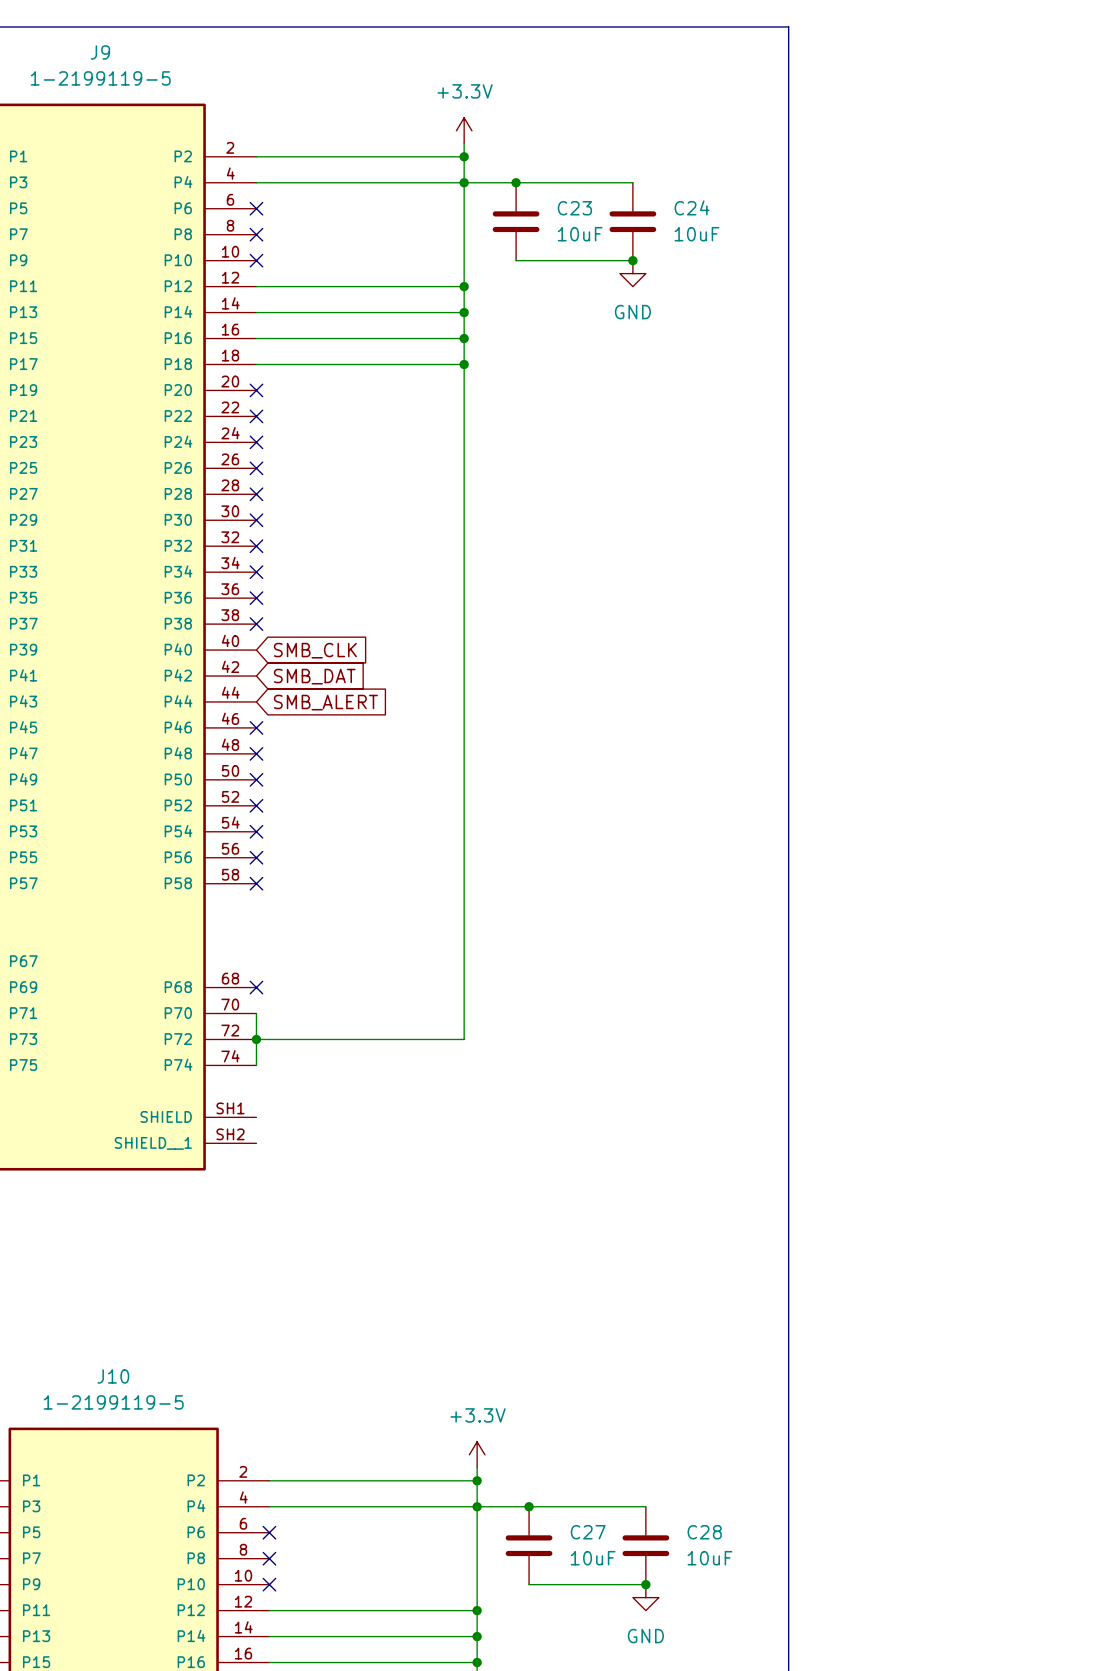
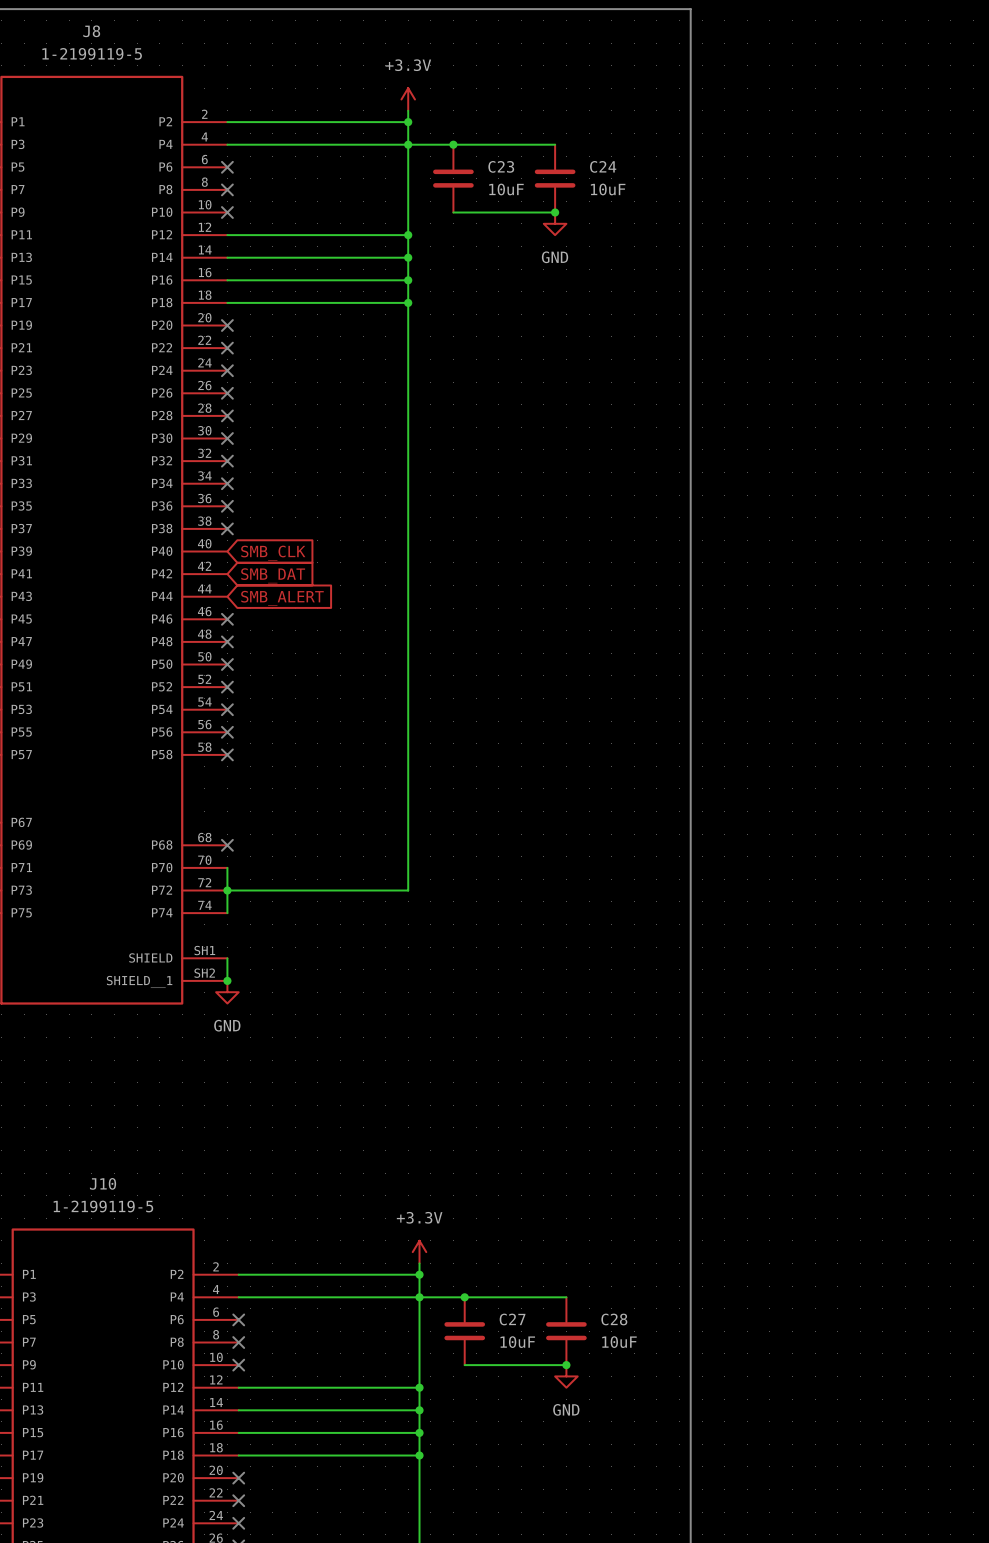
J9 name: J9 (100, 52) -> J8 (91, 31)
wire: none -> (227, 958) (227, 980)
junction: none -> (227, 980)
power symbol: none -> GND (227, 992)

